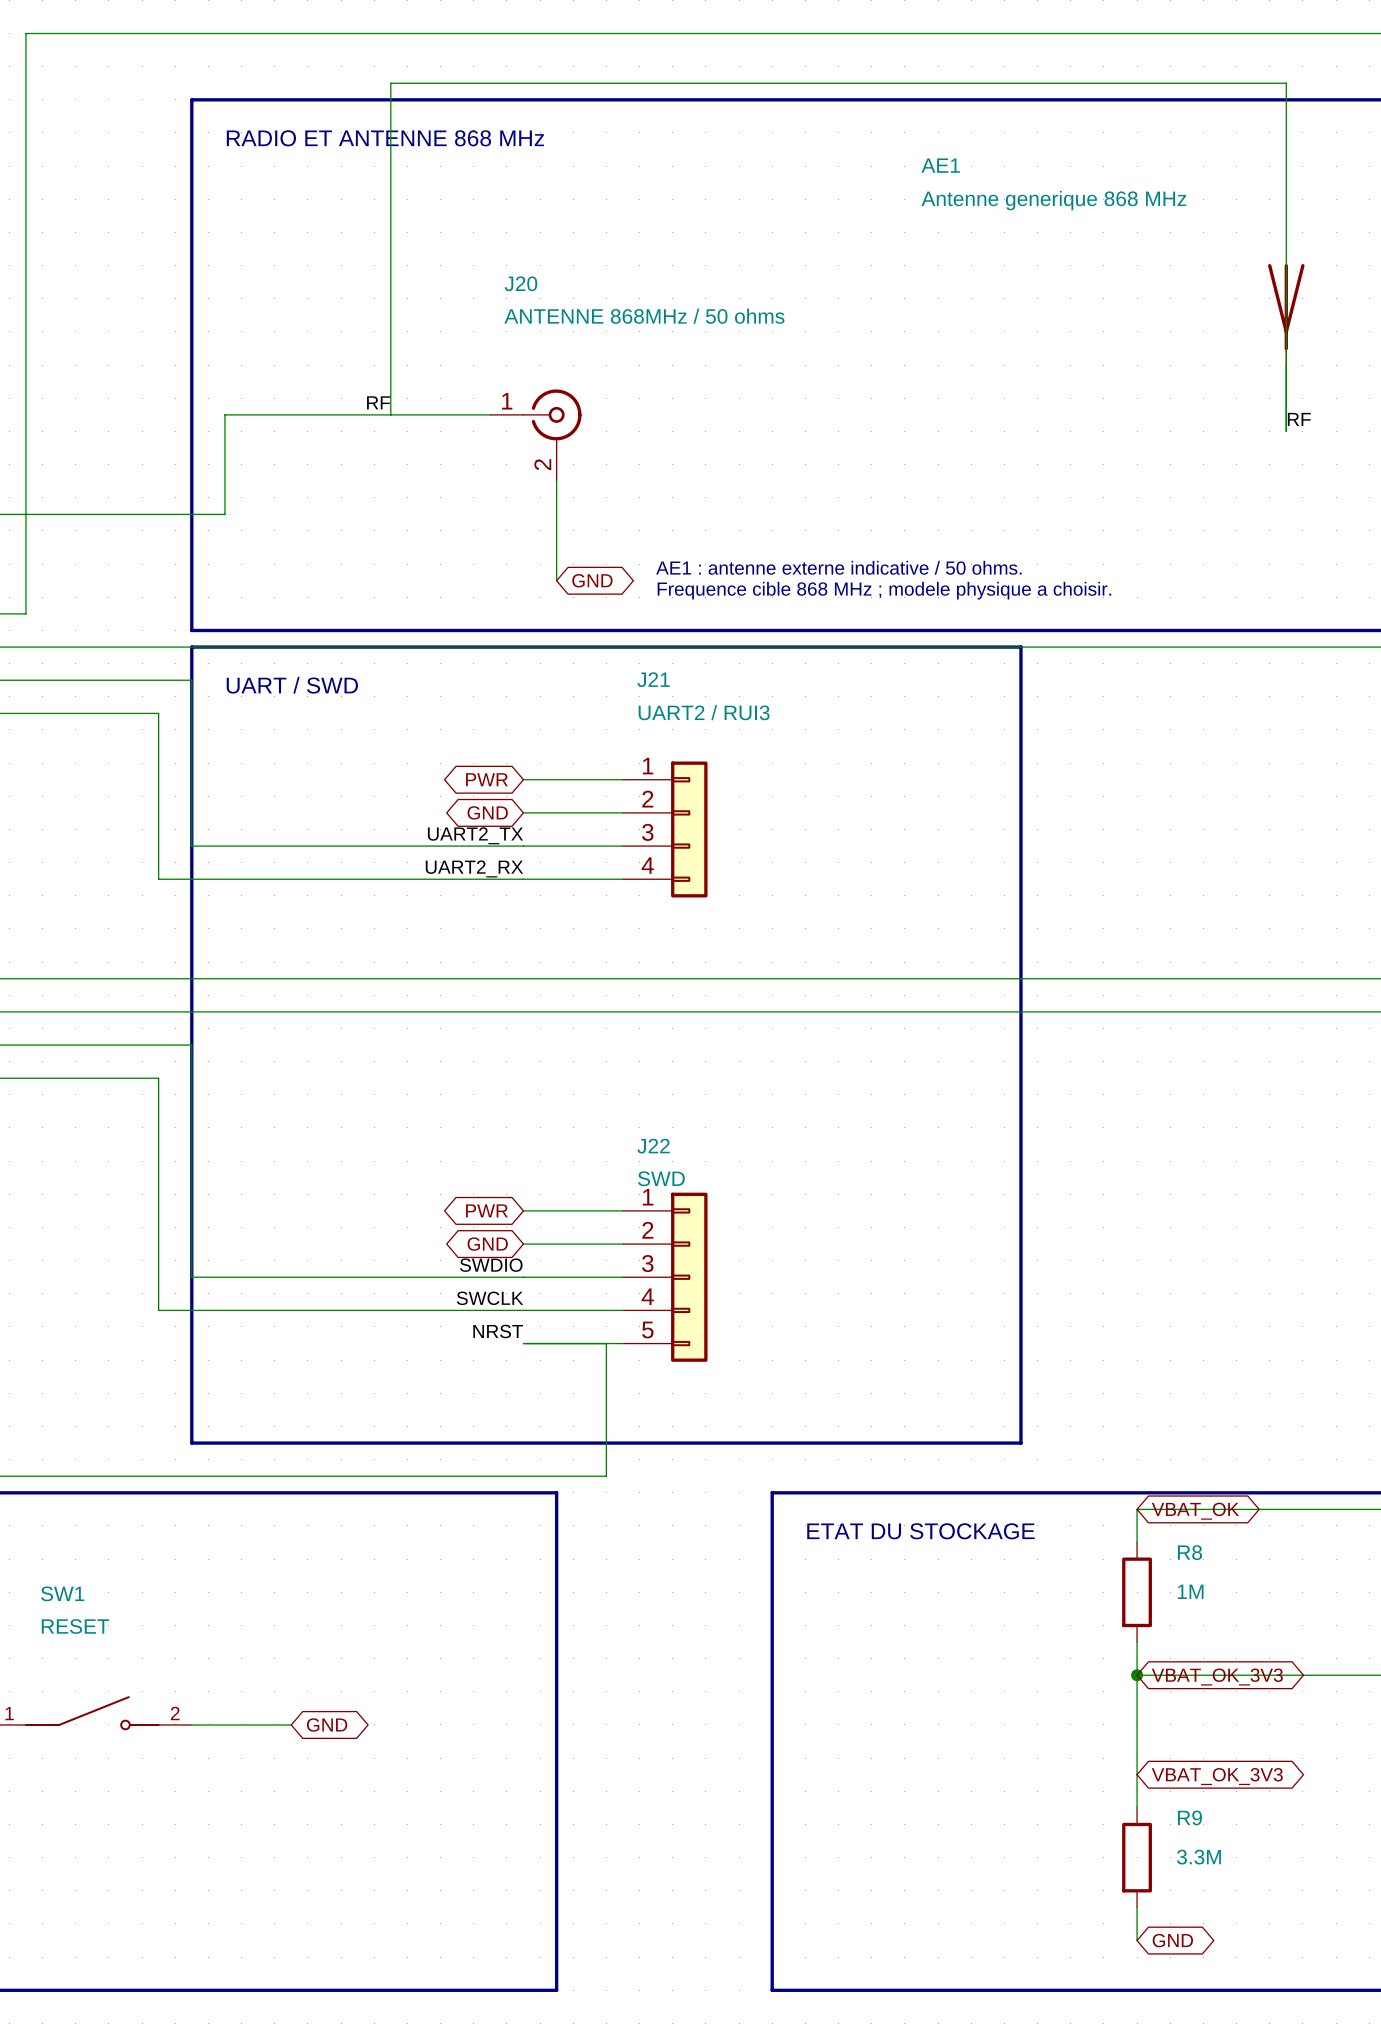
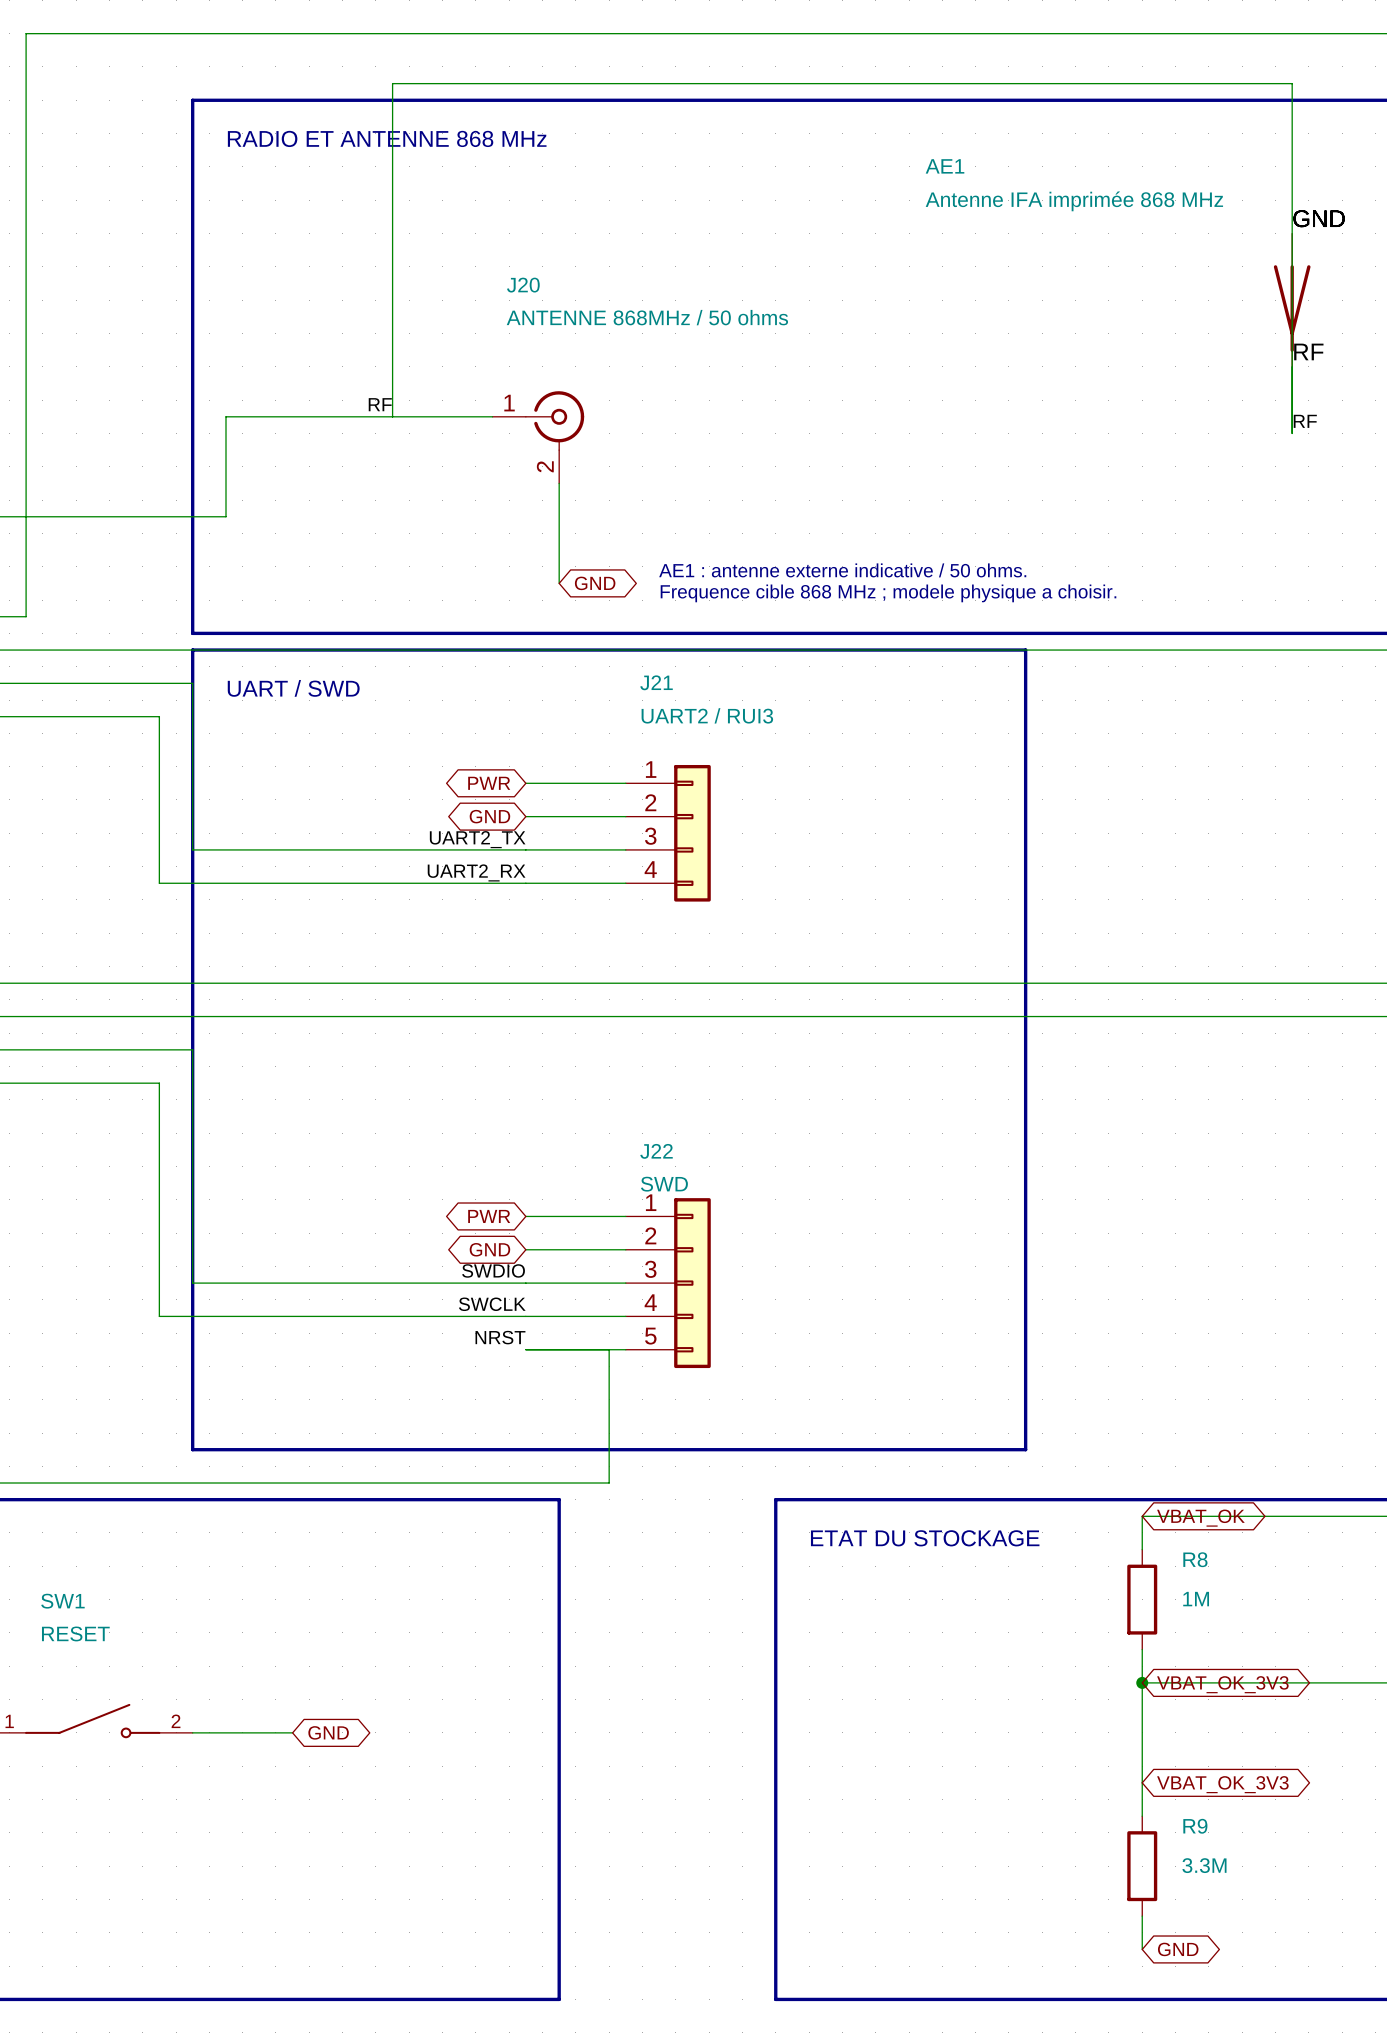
AE1 value: Antenne generique 868 MHz (1053, 200) -> Antenne IFA imprimée 868 MHz (1074, 201)
label: none -> GND (1319, 218)
AE1 symbol: [1268, 264, 1305, 366] -> [1273, 233, 1311, 367]
label: none -> RF (1308, 351)

